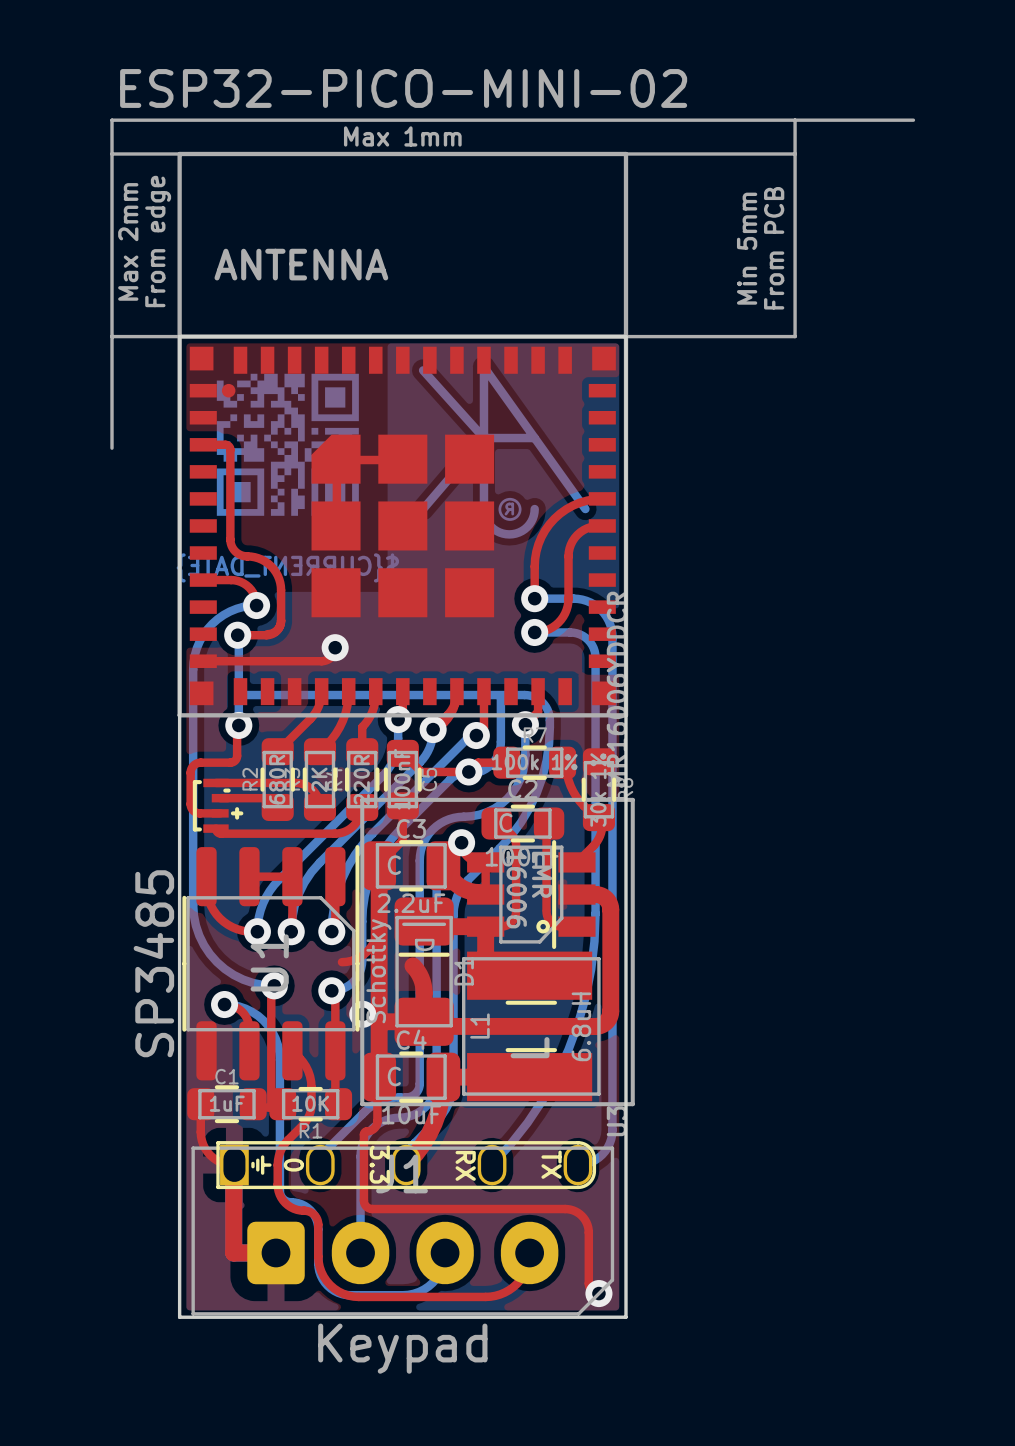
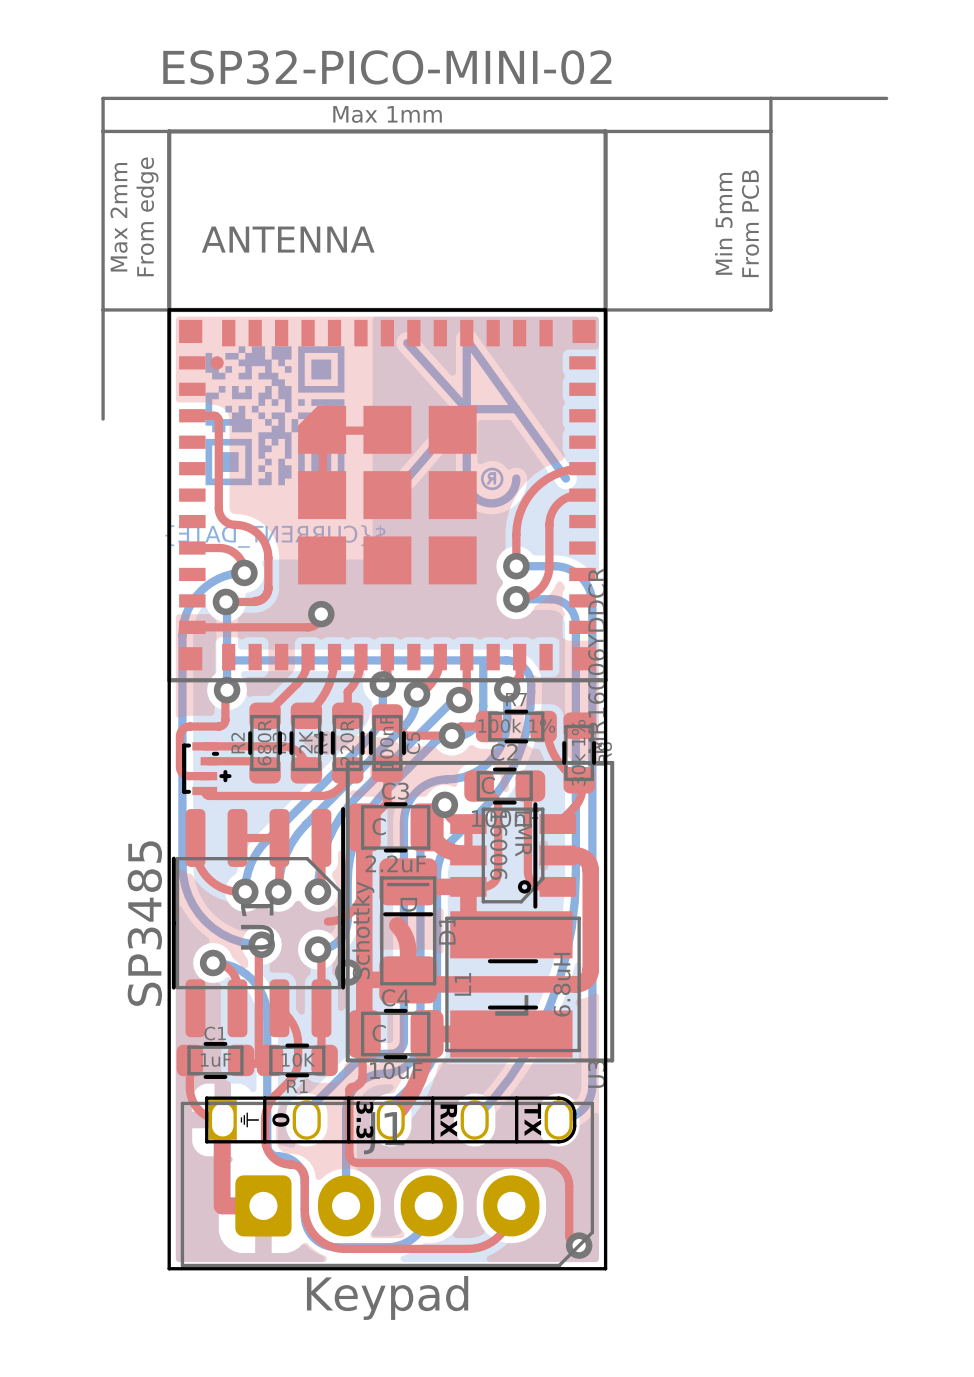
part footprint: [216, 1141, 597, 1190] -> [205, 1096, 577, 1144]

